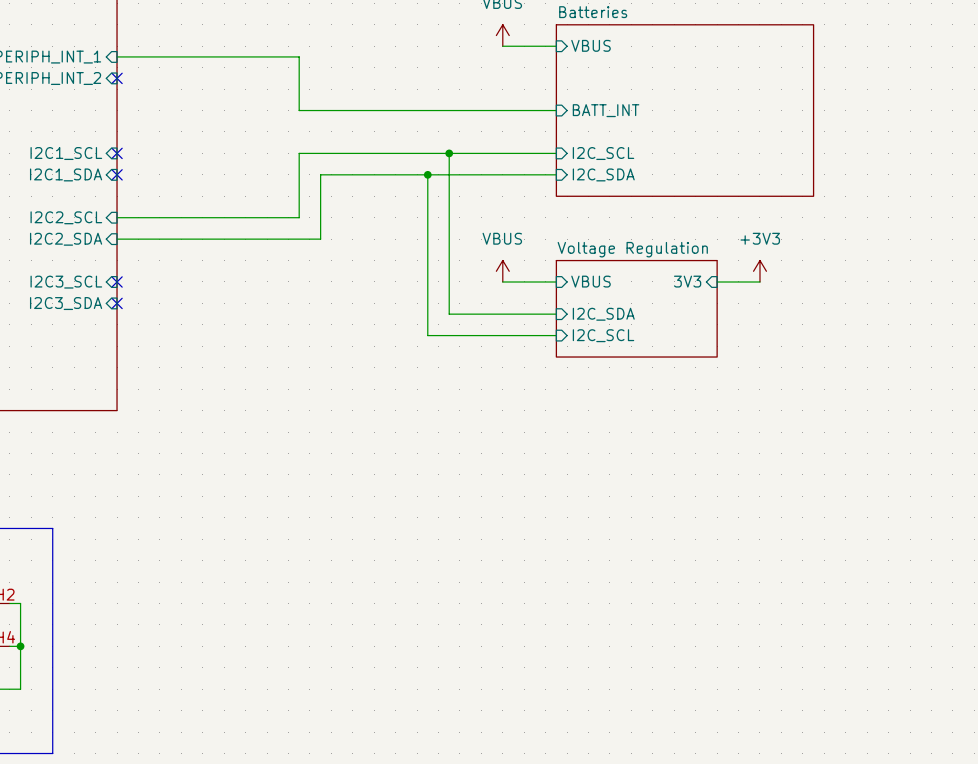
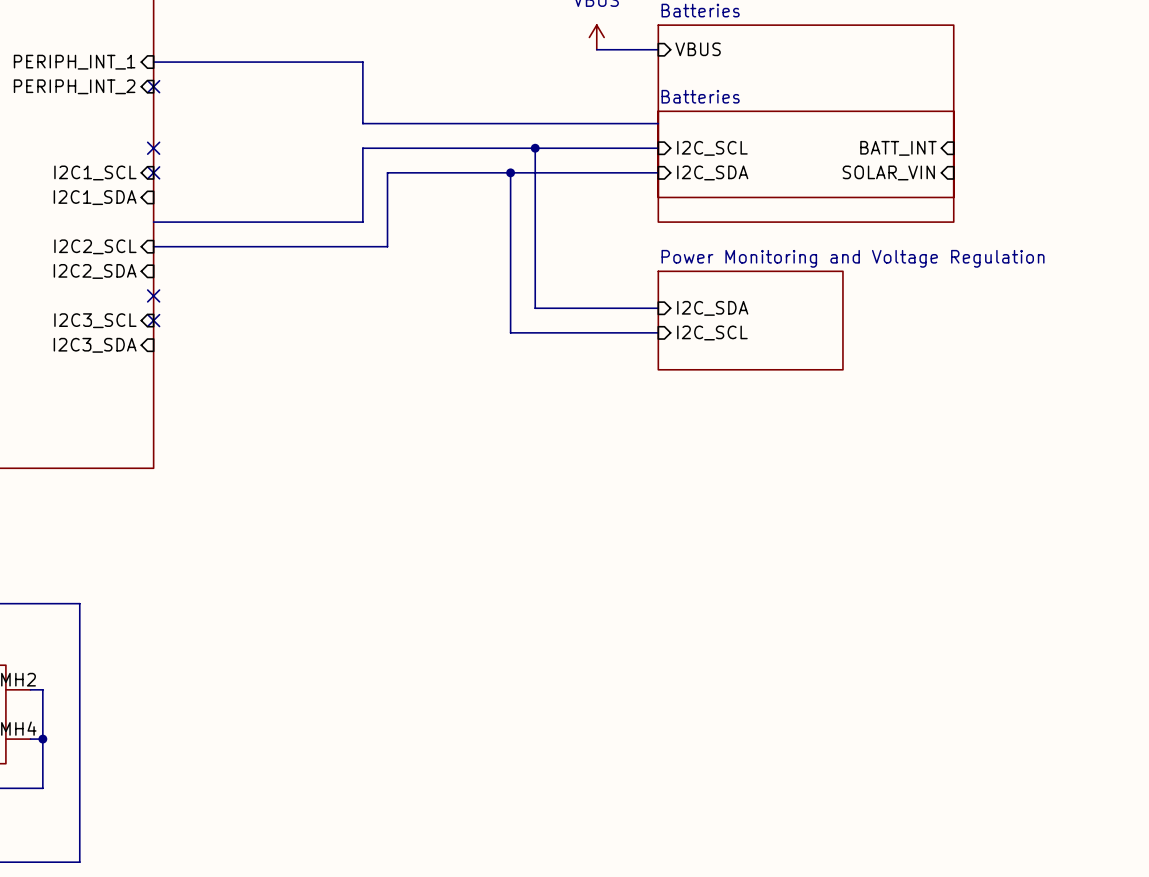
sheet pin: BATT_INT (606, 110) -> none
no-connect mark: none -> (153, 148)
wire: none -> (535, 148) (535, 172)
junction: none -> (535, 148)
wire: none -> (658, 148) (362, 148) (362, 172)
sheet pin: none -> I2C_SCL (712, 148)
sheet pin: none -> BATT_INT (898, 148)
sheet Batteries: none -> (806, 154)
wire: (299, 153) (320, 153) -> (387, 197) (387, 172)
wire: none -> (510, 172) (510, 197)
junction: none -> (510, 172)
junction: (449, 153) -> none
sheet pin: I2C_SCL (603, 153) -> I2C_SDA (712, 172)
sheet pin: none -> SOLAR_VIN (888, 172)
no-connect mark: (117, 174) -> none
wire: (320, 174) (556, 174) -> none
junction: (427, 174) -> none
sheet pin: I2C_SDA (603, 174) -> none
wire: none -> (153, 222) (362, 222)
wire: (299, 196) (299, 217) -> (387, 246) (362, 246)
wire: (320, 217) (320, 239) (117, 239) -> none
no-connect mark: none -> (153, 295)
wire: (449, 271) (449, 314) (556, 314) -> (535, 308) (658, 308)
power symbol: VBUS (502, 271) -> none
power symbol: +3V3 (759, 271) -> none
wire: (502, 281) (556, 281) -> none
sheet pin: VBUS (590, 281) -> none
sheet Power Monitoring and Voltage Regulation: none -> (750, 320)
sheet pin: 3V3 (687, 281) -> none
wire: (717, 281) (759, 281) -> none
wire: (427, 292) (427, 335) (556, 335) -> (510, 332) (658, 332)
no-connect mark: (117, 303) -> none
sheet Voltage Regulation: (636, 308) -> none
sheet pin position: I2C_SDA (603, 314) -> I2C_SDA (712, 308)
sheet pin position: I2C_SCL (603, 335) -> I2C_SCL (712, 332)

